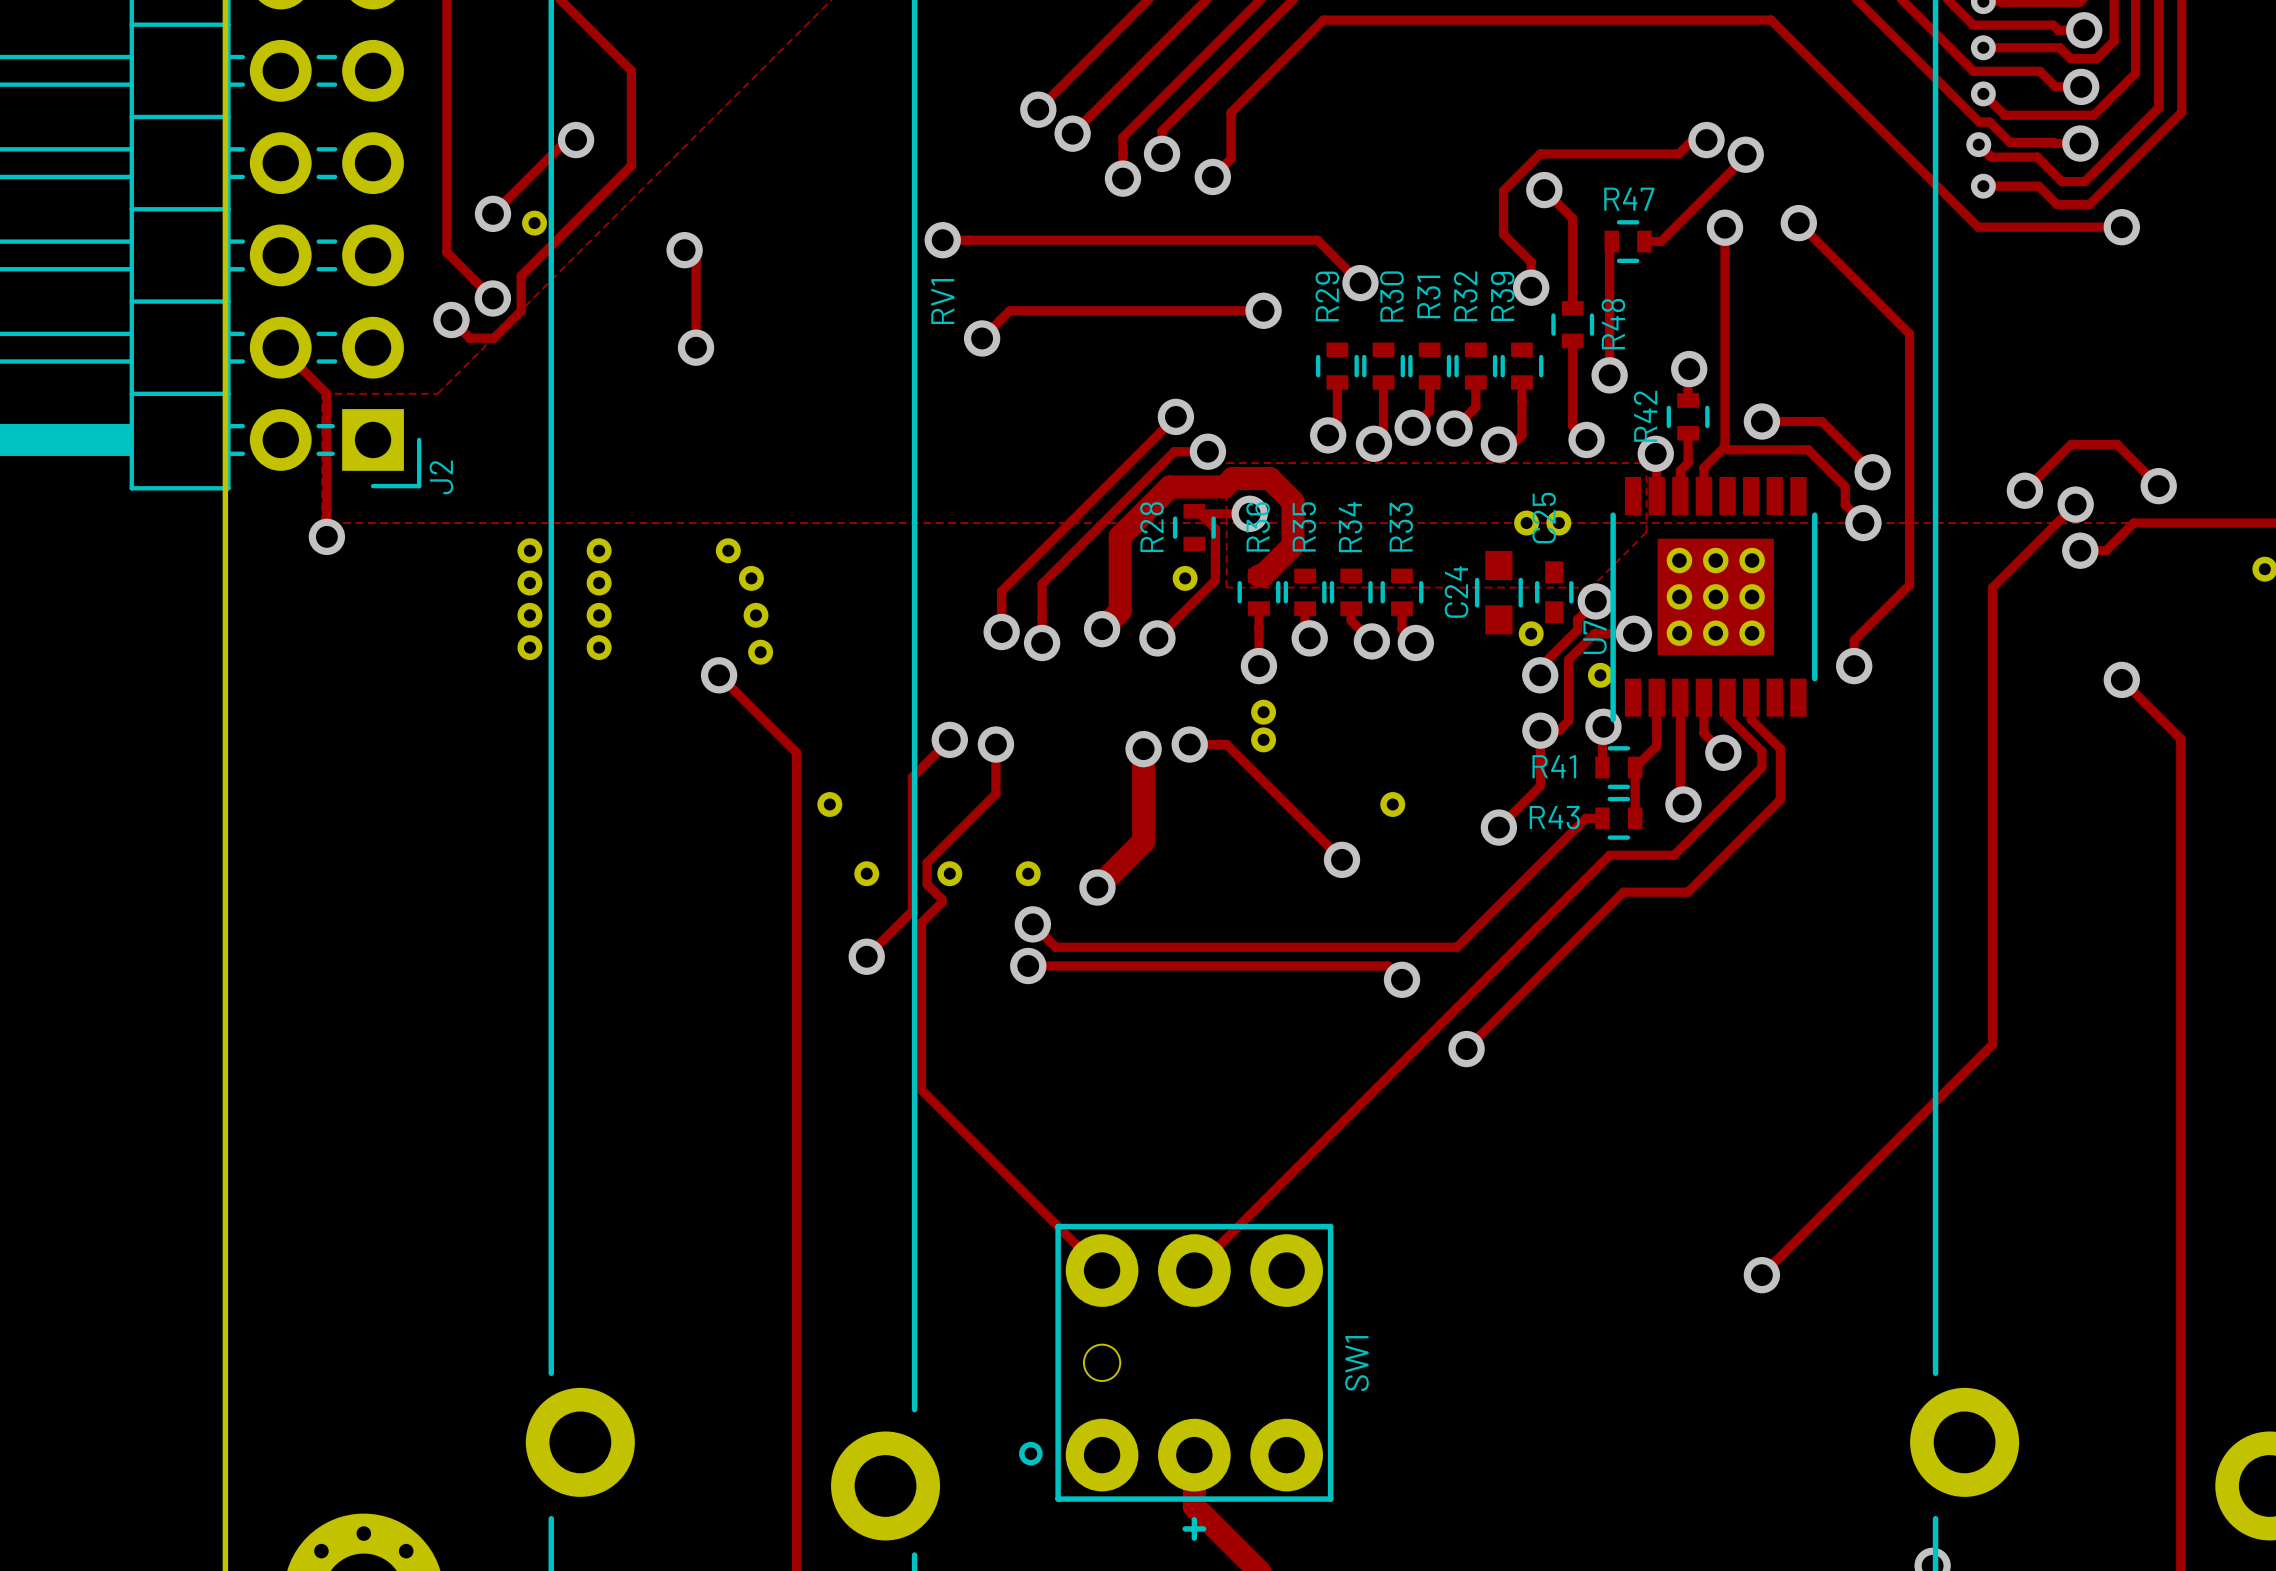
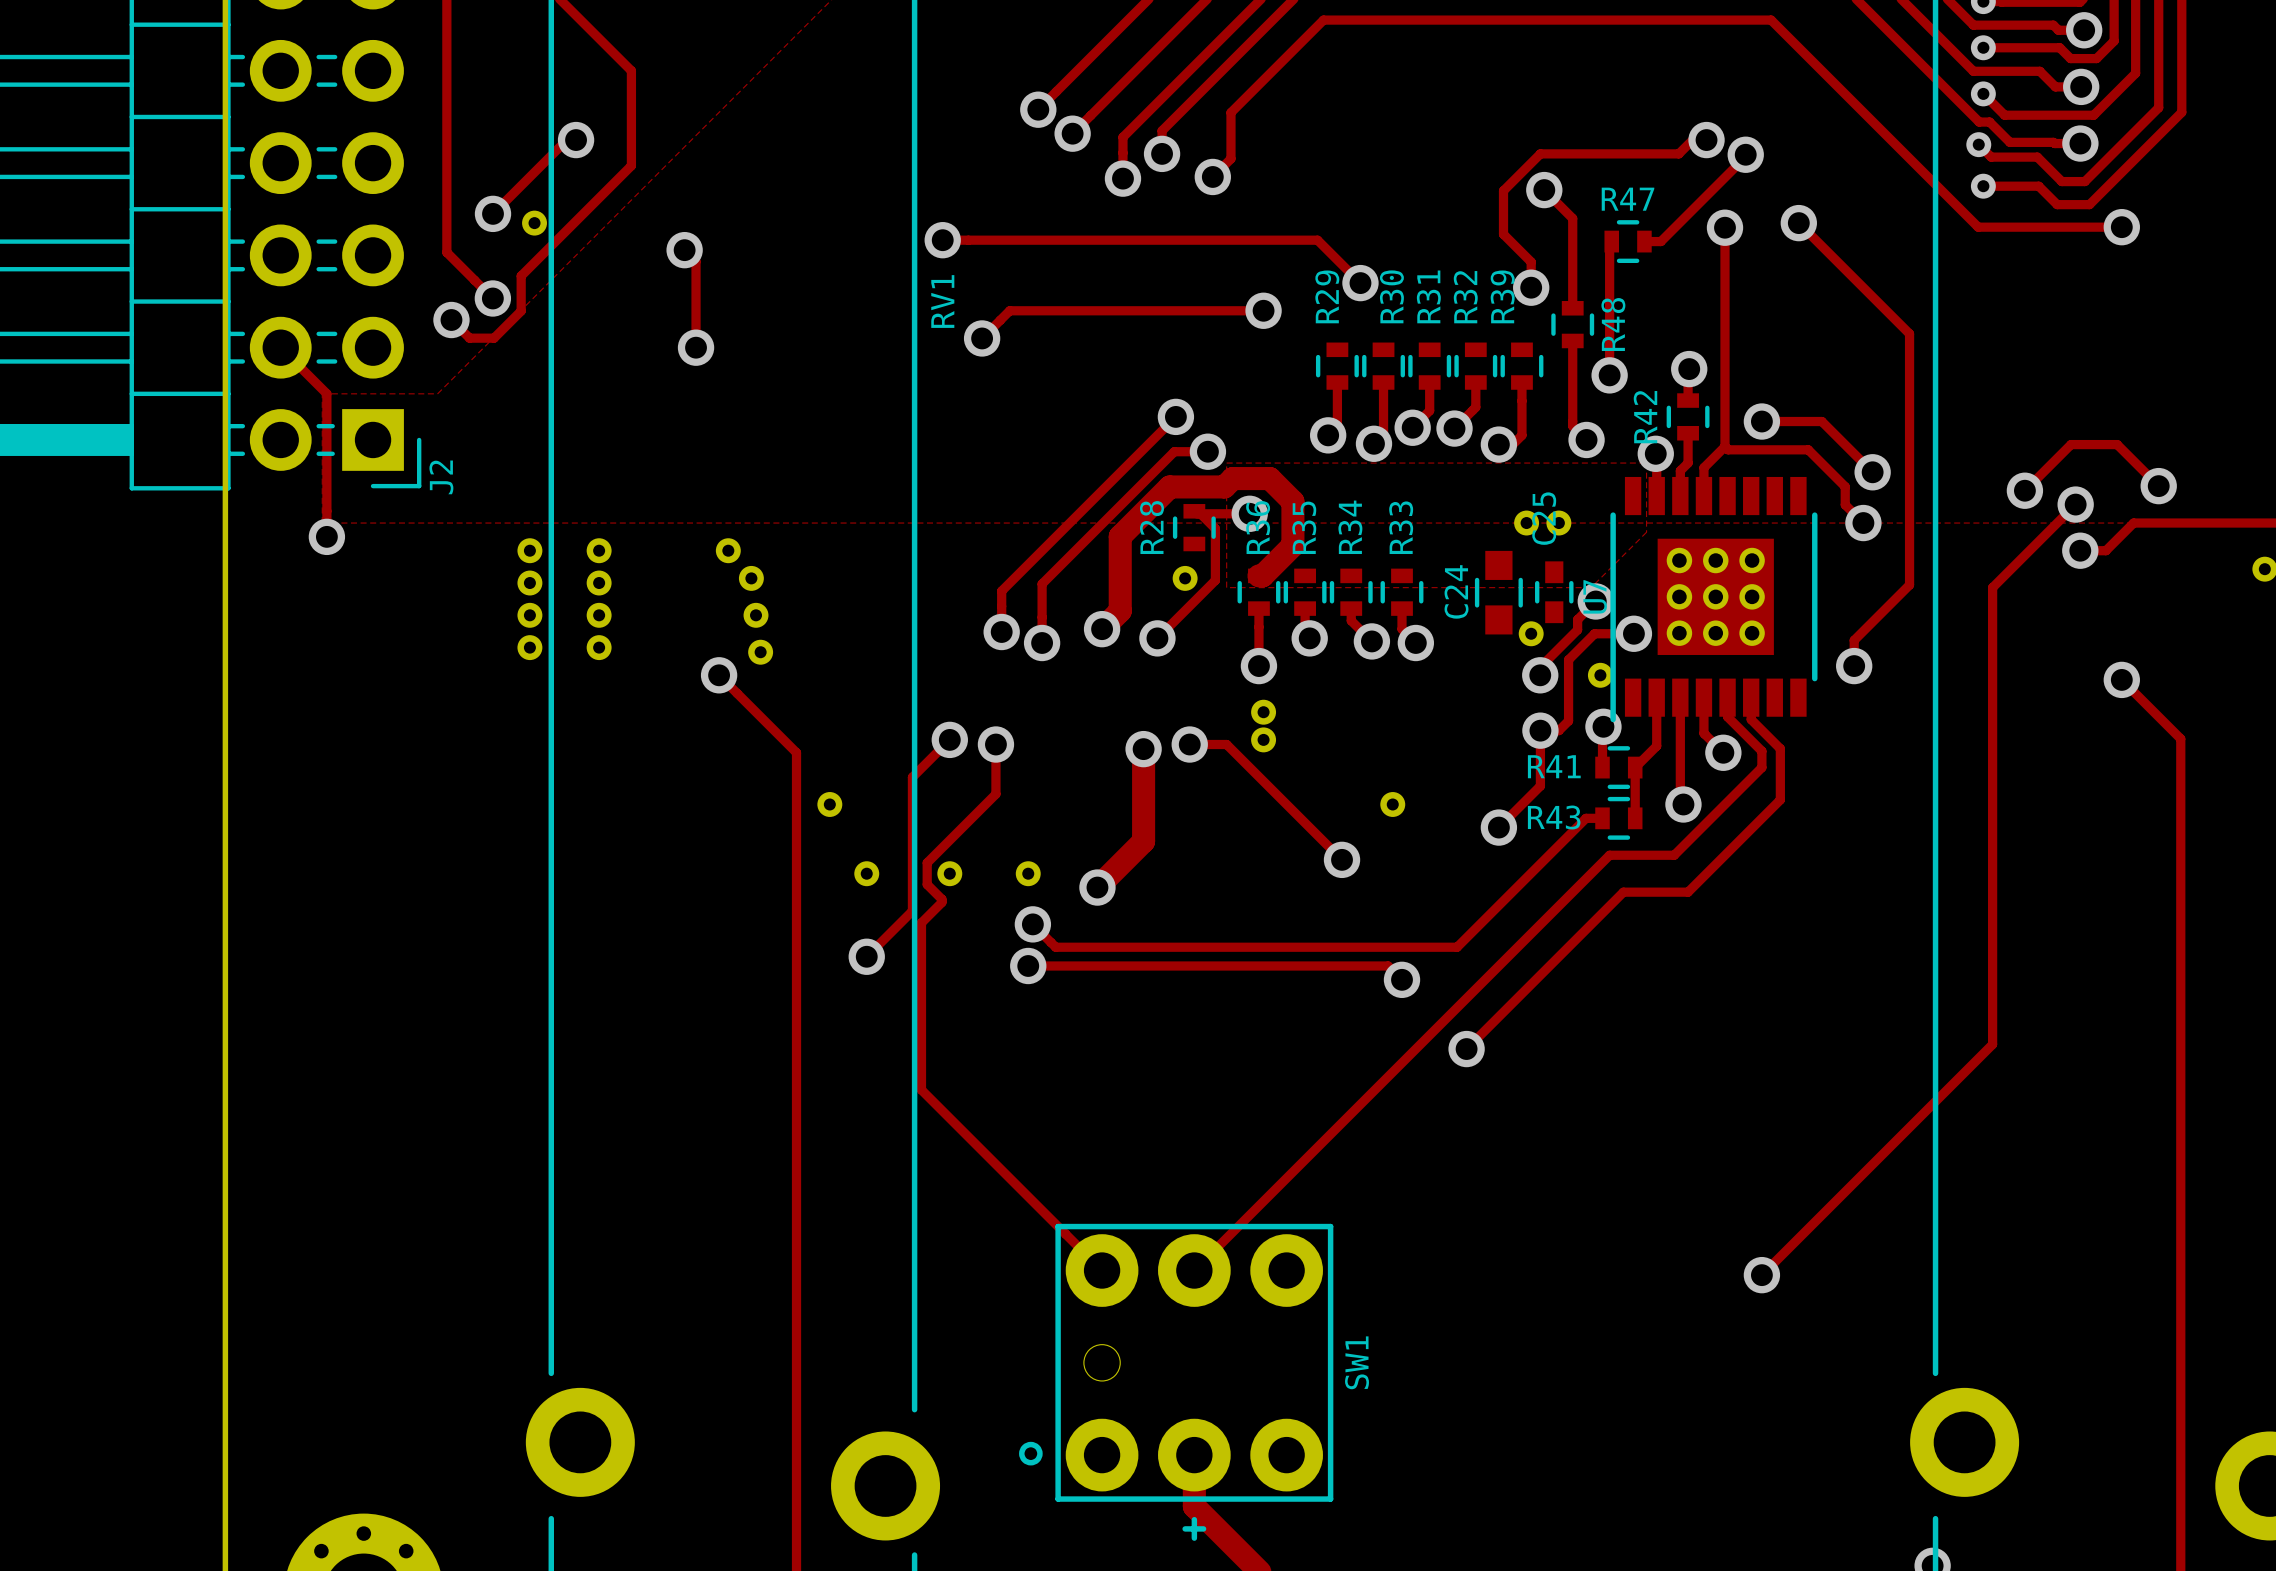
U7 name position: U7 (1595, 637) -> U7 (1595, 596)

